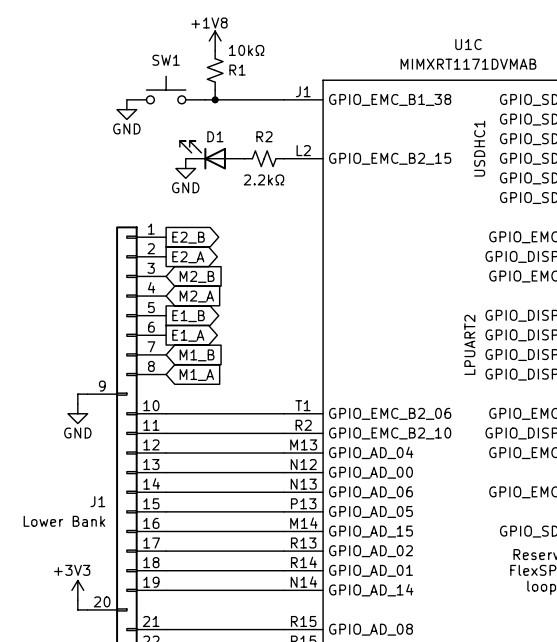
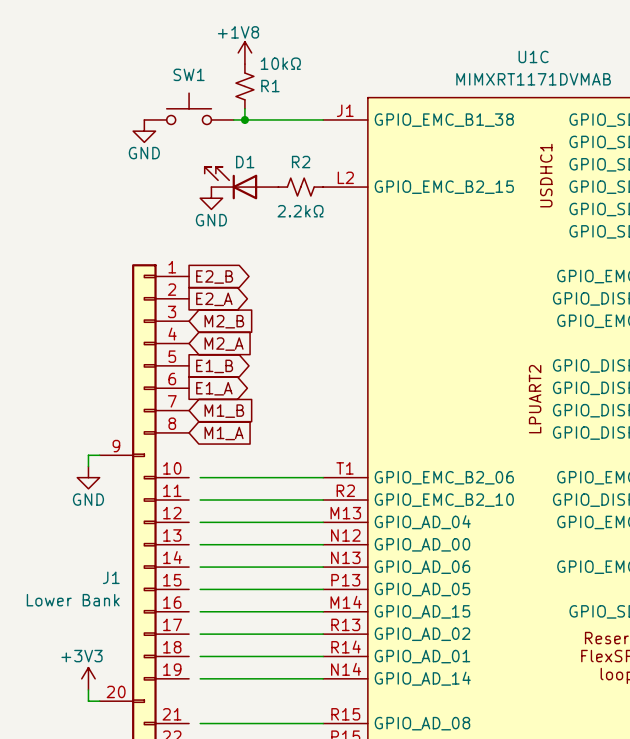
wire: (166, 413) (175, 413) -> none
wire: (166, 433) (175, 433) -> none
wire: (166, 453) (175, 453) -> none
wire: (166, 472) (175, 472) -> none
wire: (166, 492) (175, 492) -> none
wire: (166, 511) (175, 511) -> none
wire: (166, 531) (175, 531) -> none
wire: (166, 551) (175, 551) -> none
wire: (166, 570) (175, 570) -> none
wire: (166, 590) (175, 590) -> none
wire: (166, 629) (175, 629) -> none

